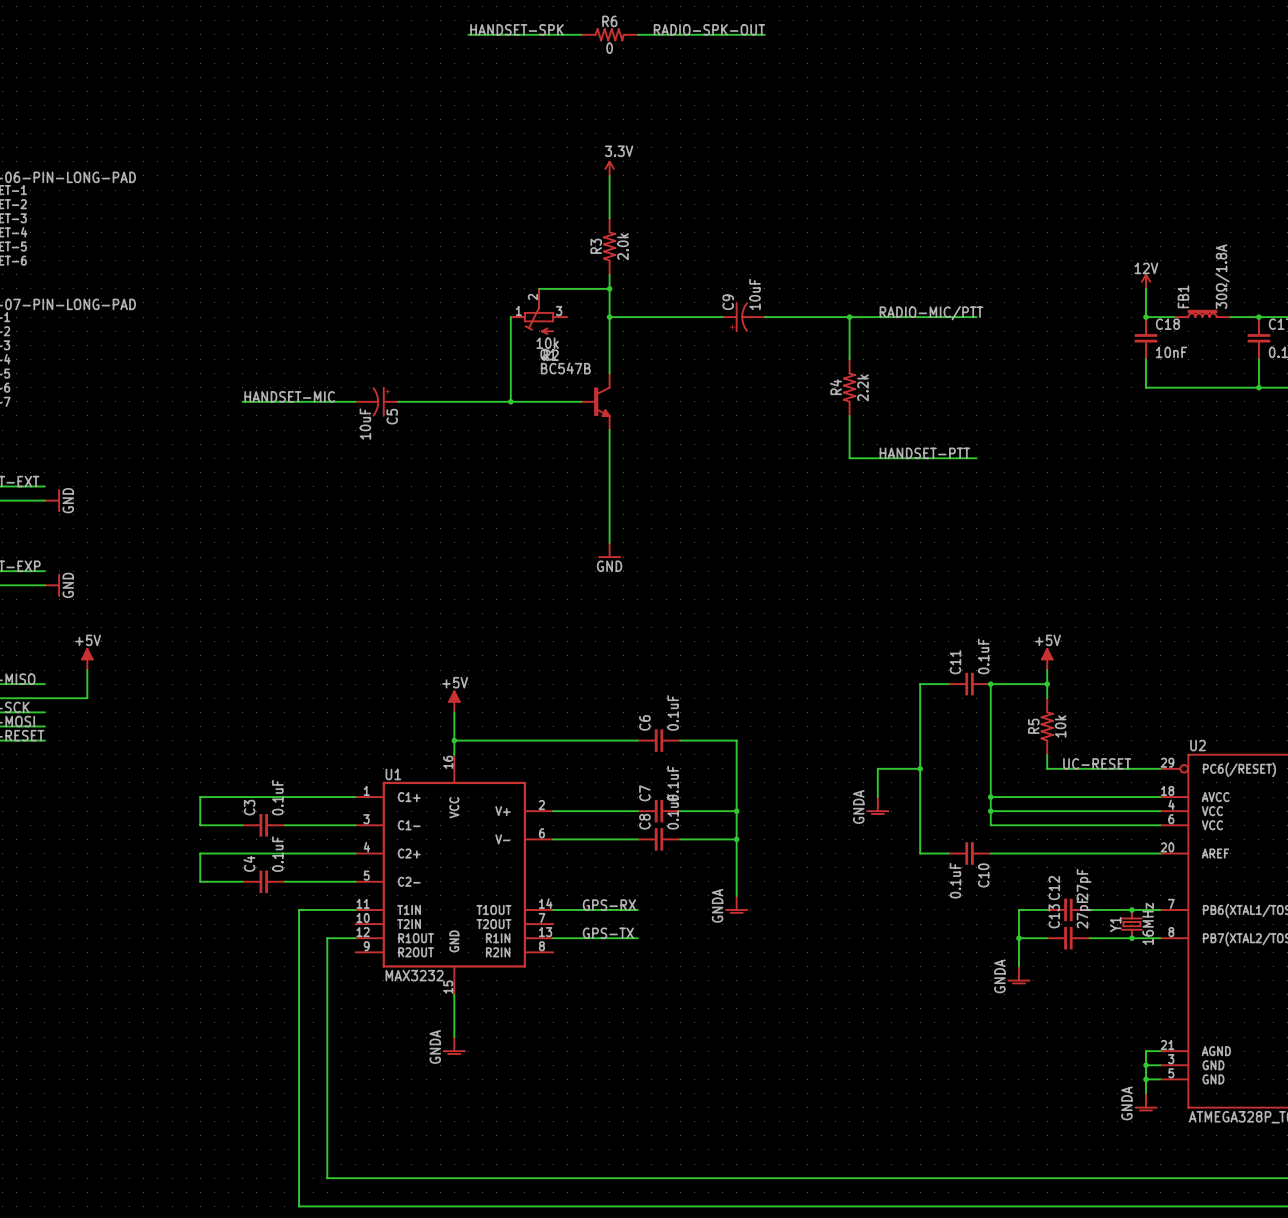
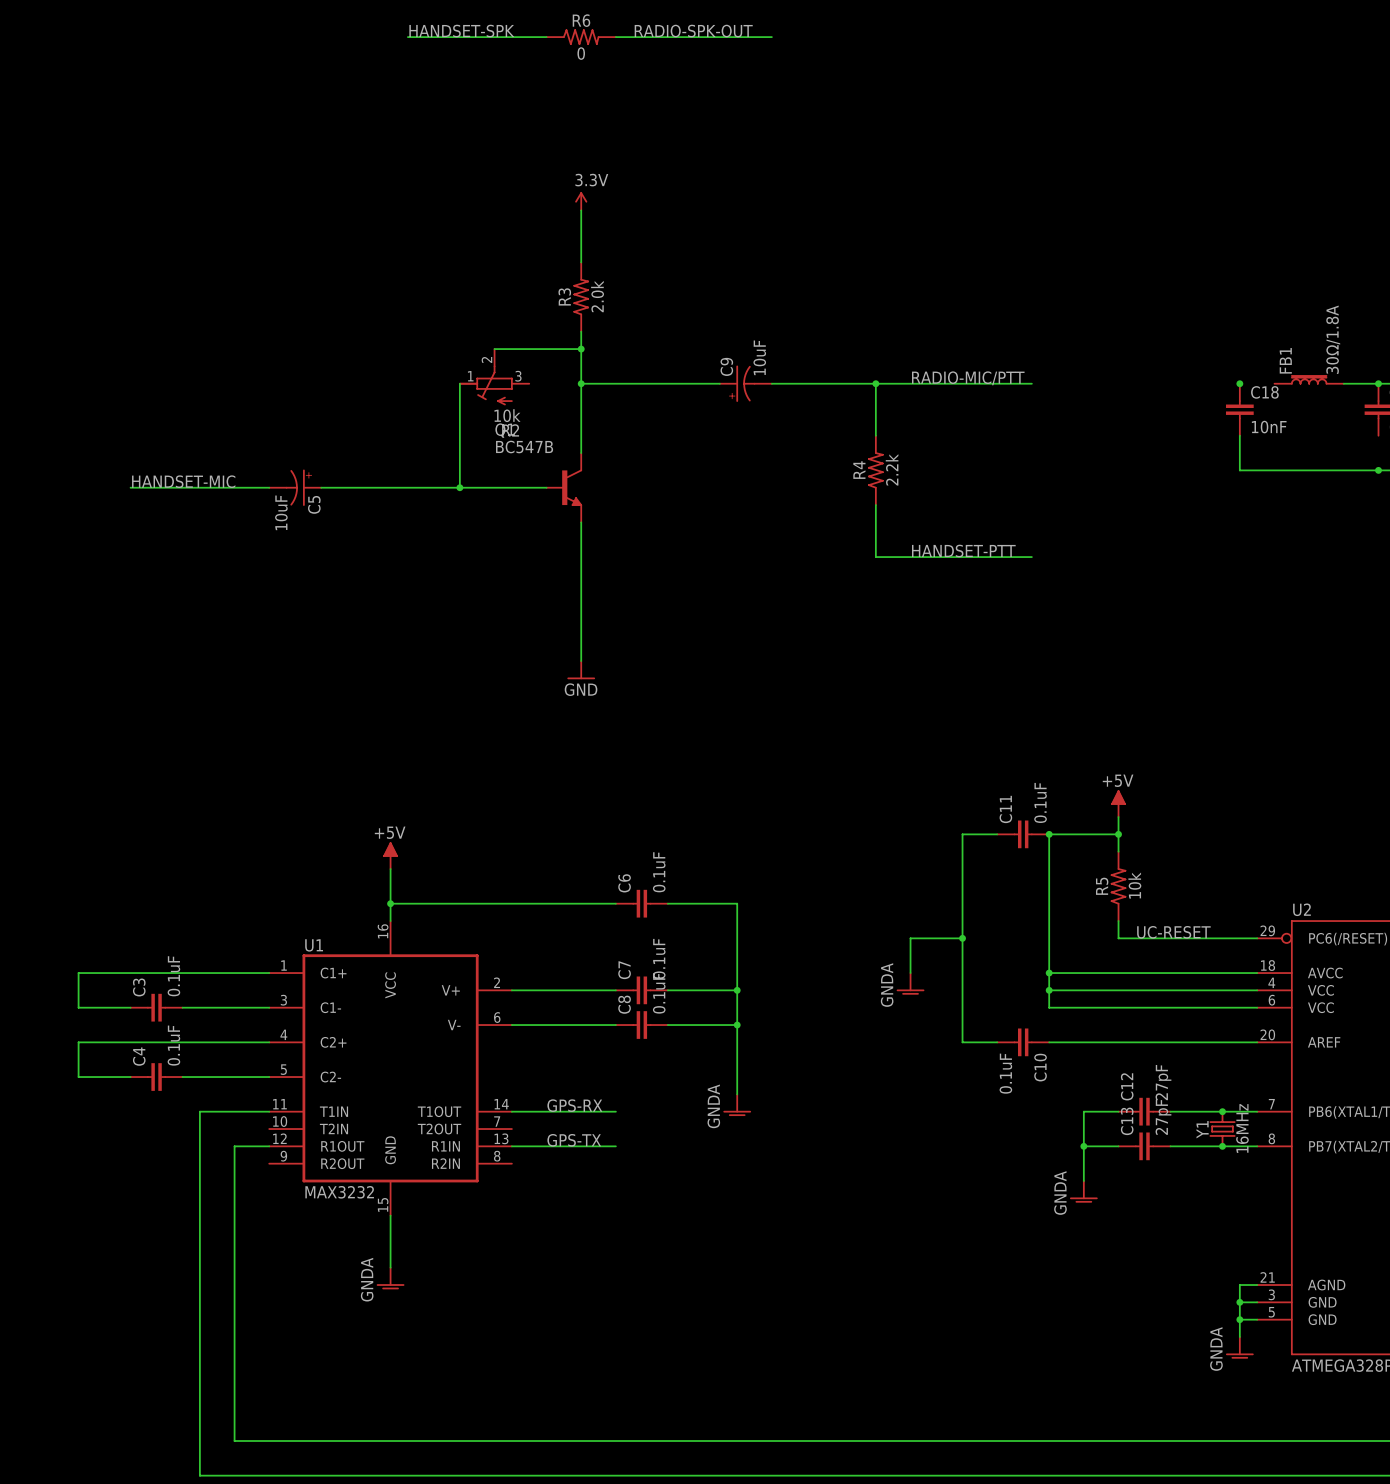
power symbol: 12V (1146, 281) -> none
wire: (1146, 288) (1146, 317) (1174, 317) -> none
wire: (1258, 359) (1258, 387) -> none

